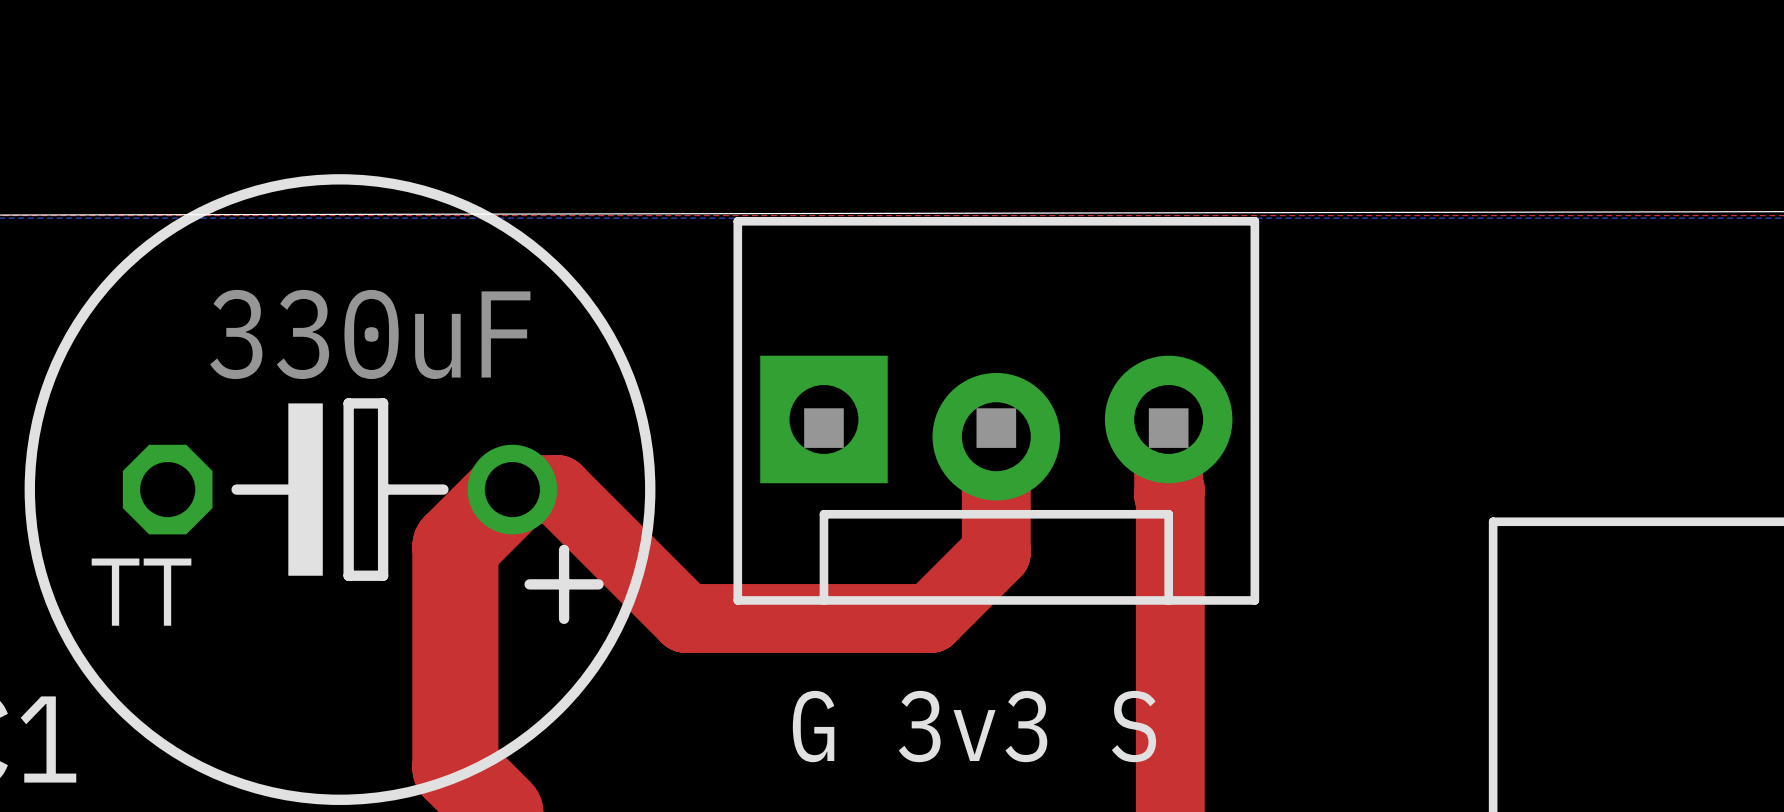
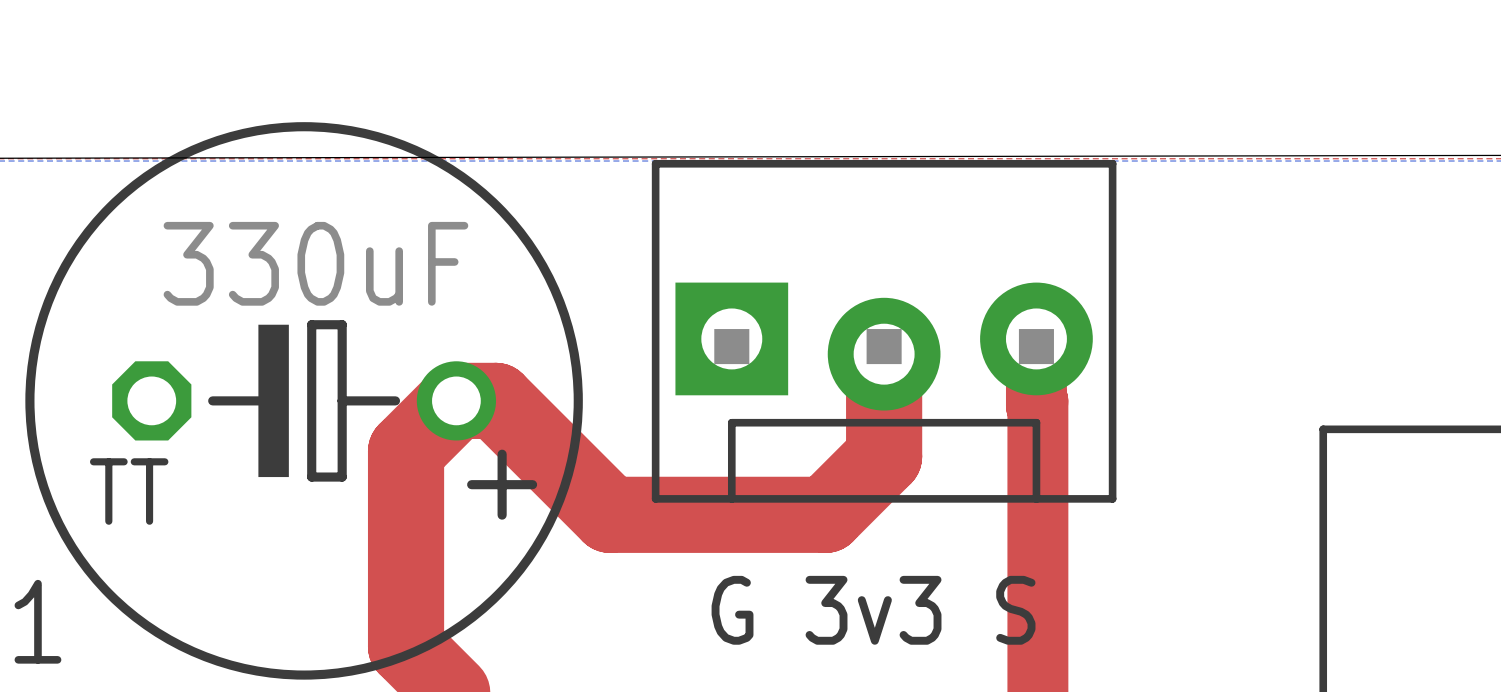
top track width: thin (996, 436) (996, 552) (930, 618) (686, 618) (557, 489) (512, 489) -> thick (884, 354) (884, 456) (825, 514) (609, 514) (496, 400) (456, 400)

